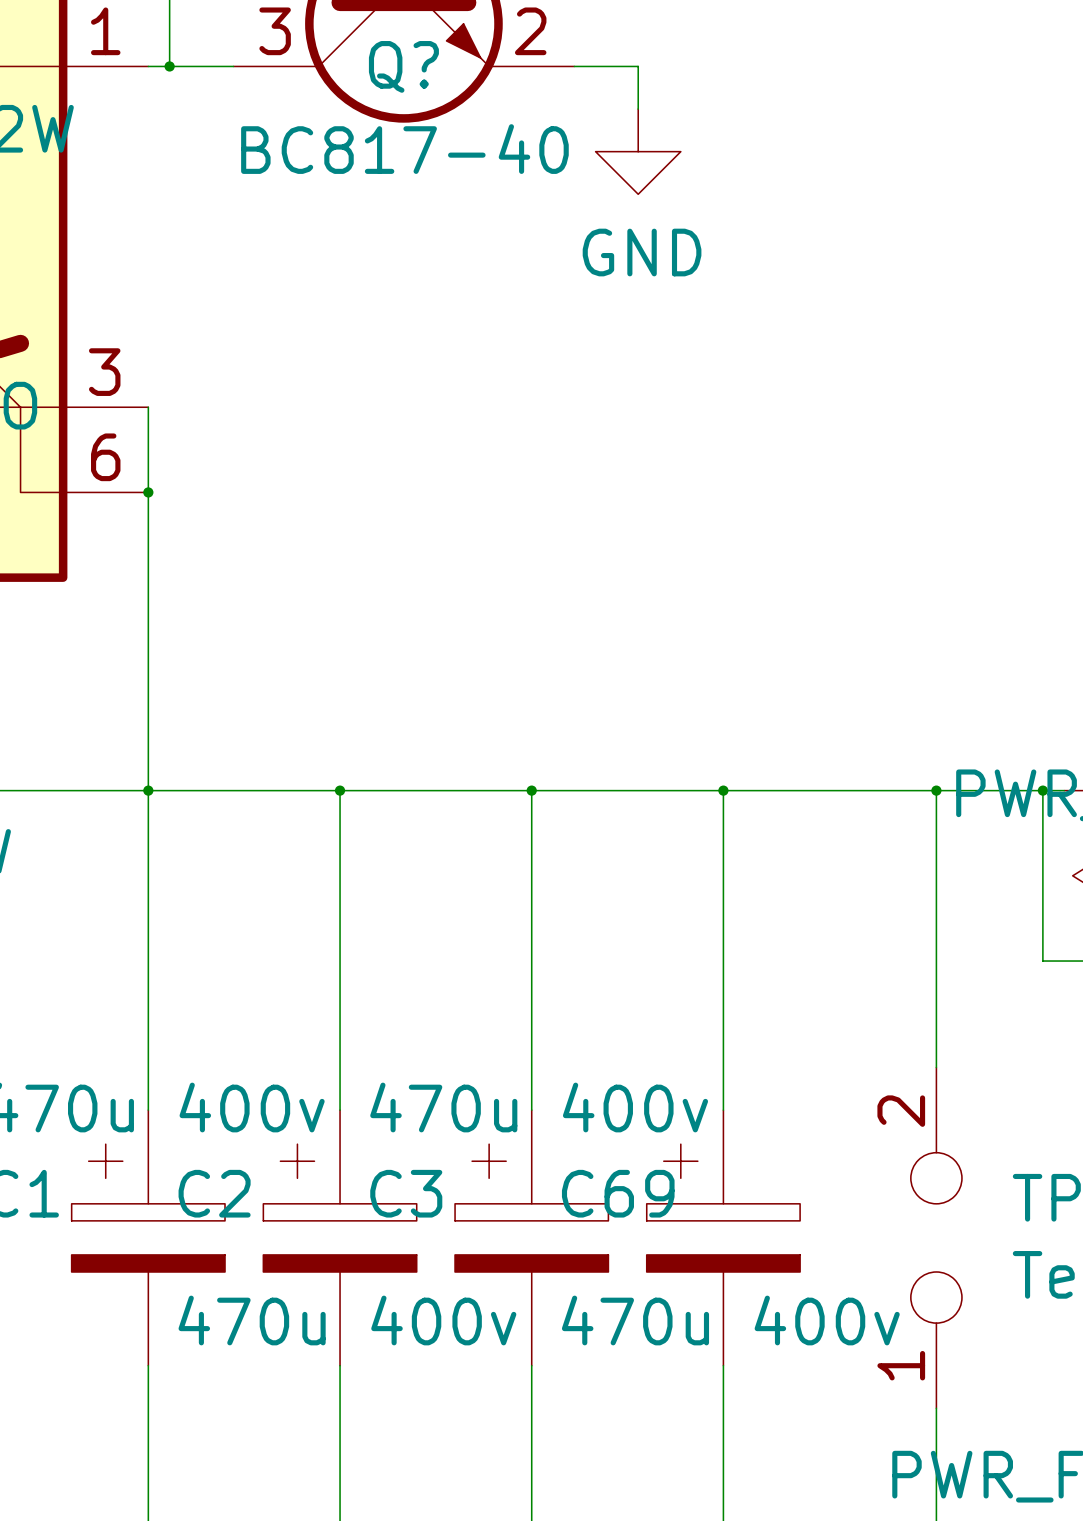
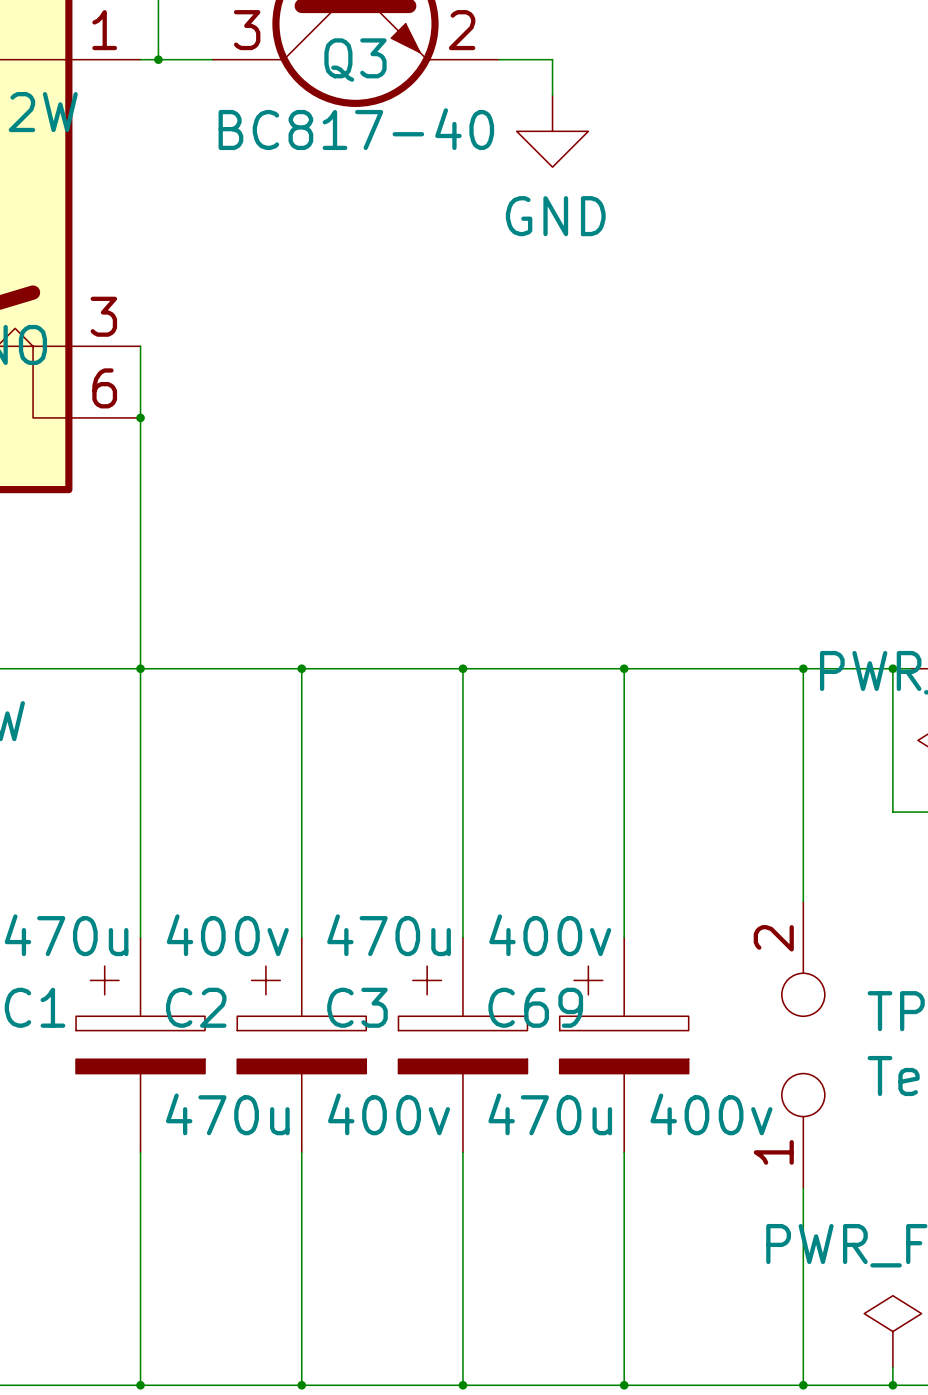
Q? name: Q? (403, 66) -> Q3 (355, 60)

